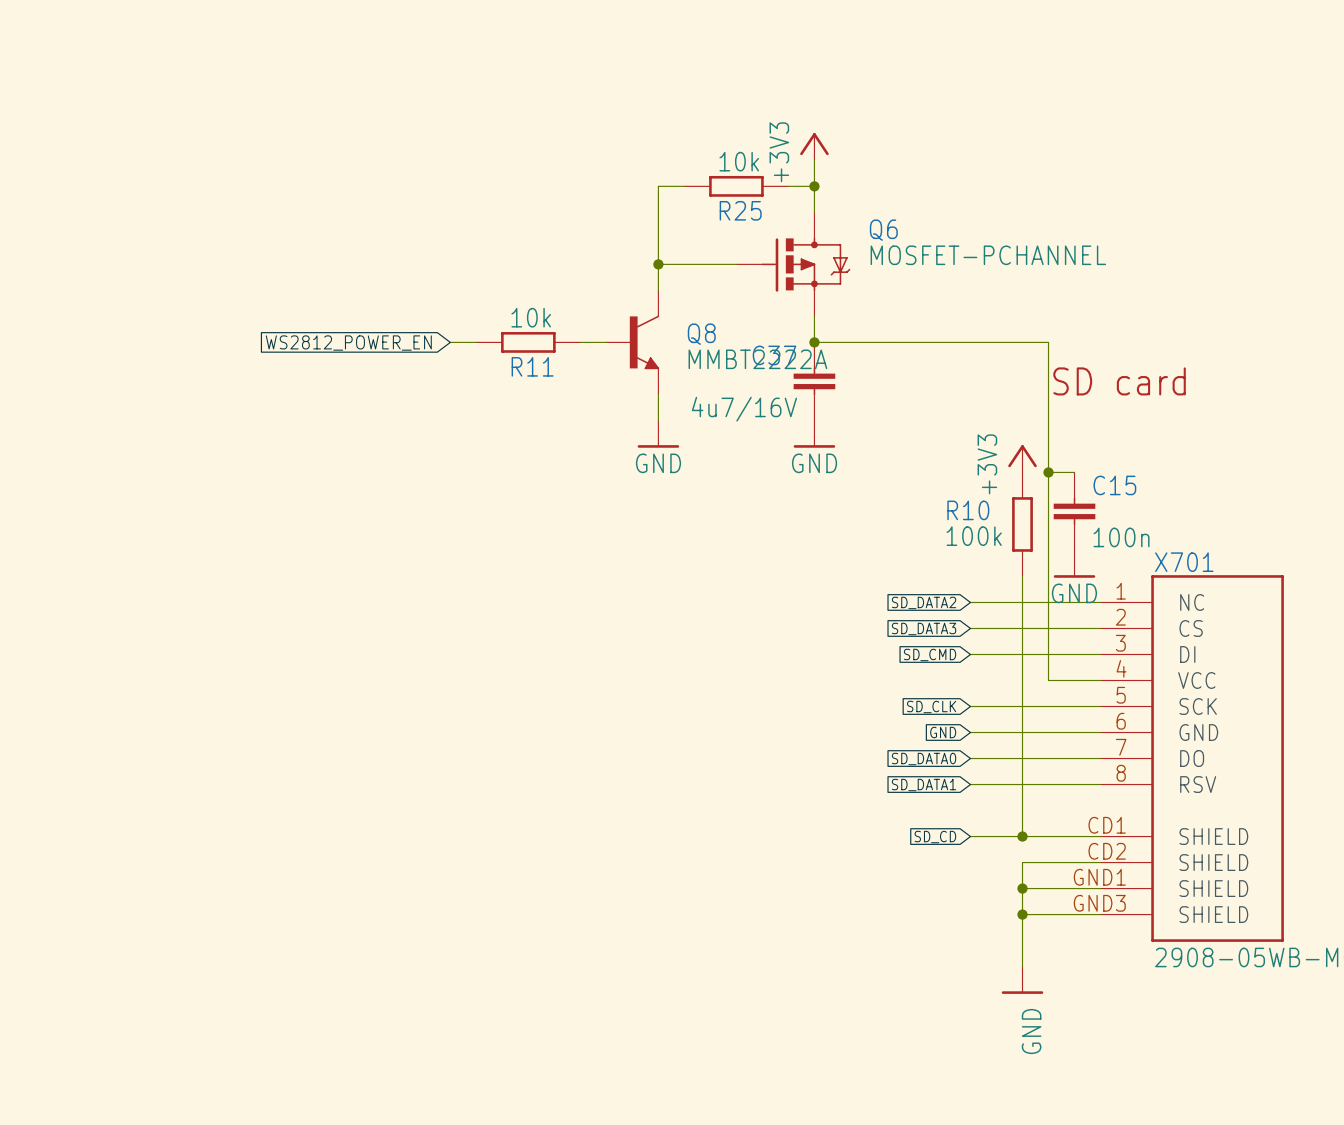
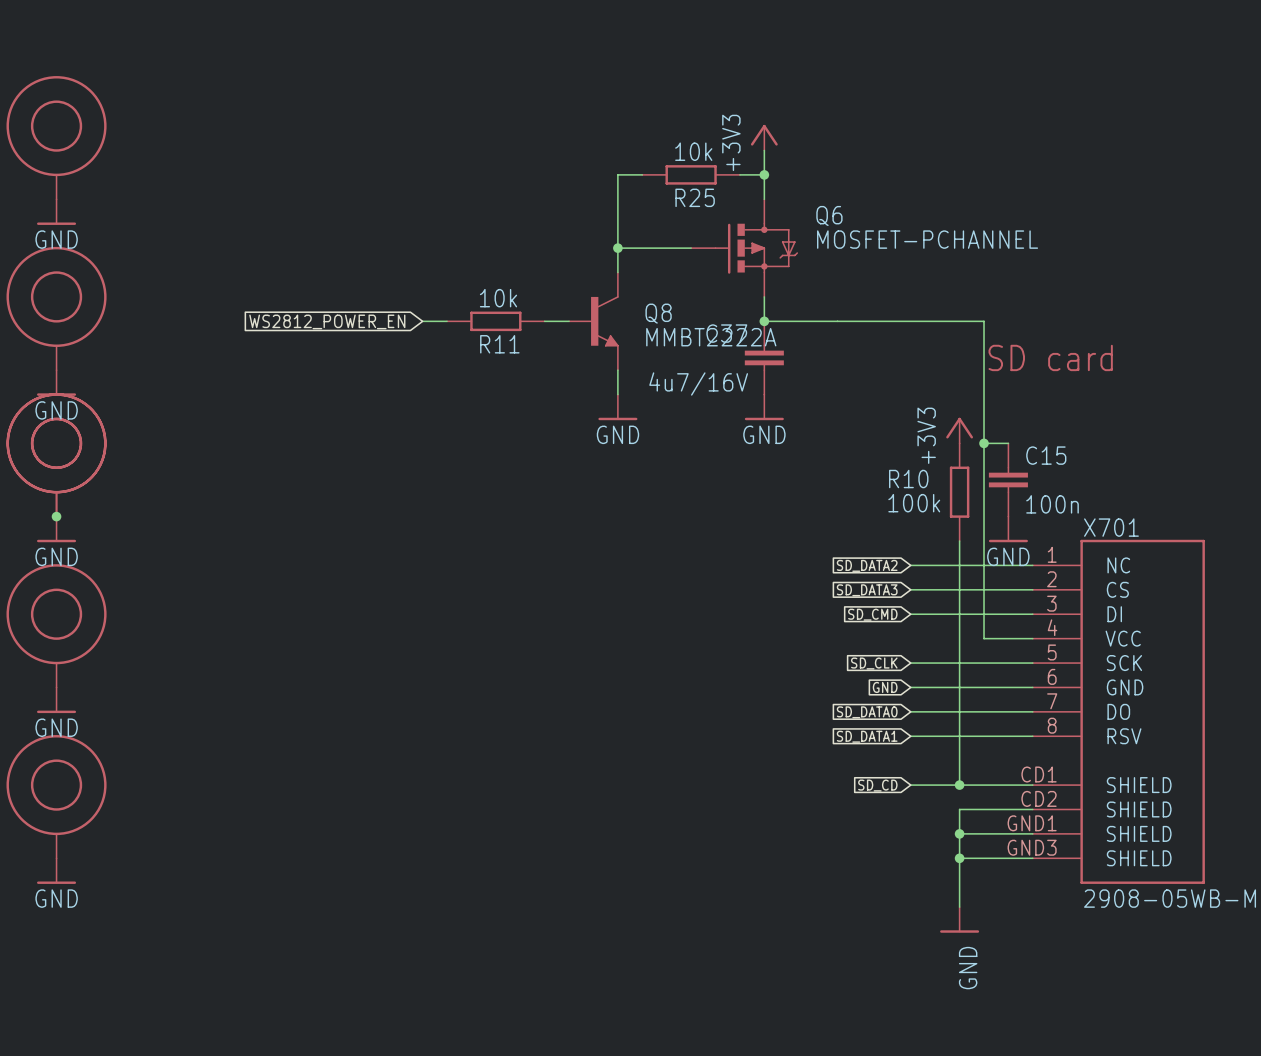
part: none -> (56, 137)
power symbol: none -> GND (56, 212)
part: none -> (56, 308)
power symbol: none -> GND (56, 382)
part: none -> (56, 454)
junction: none -> (56, 516)
power symbol: none -> GND (56, 529)
part: none -> (56, 625)
power symbol: none -> GND (56, 700)
part: none -> (56, 796)
power symbol: none -> GND (56, 871)

